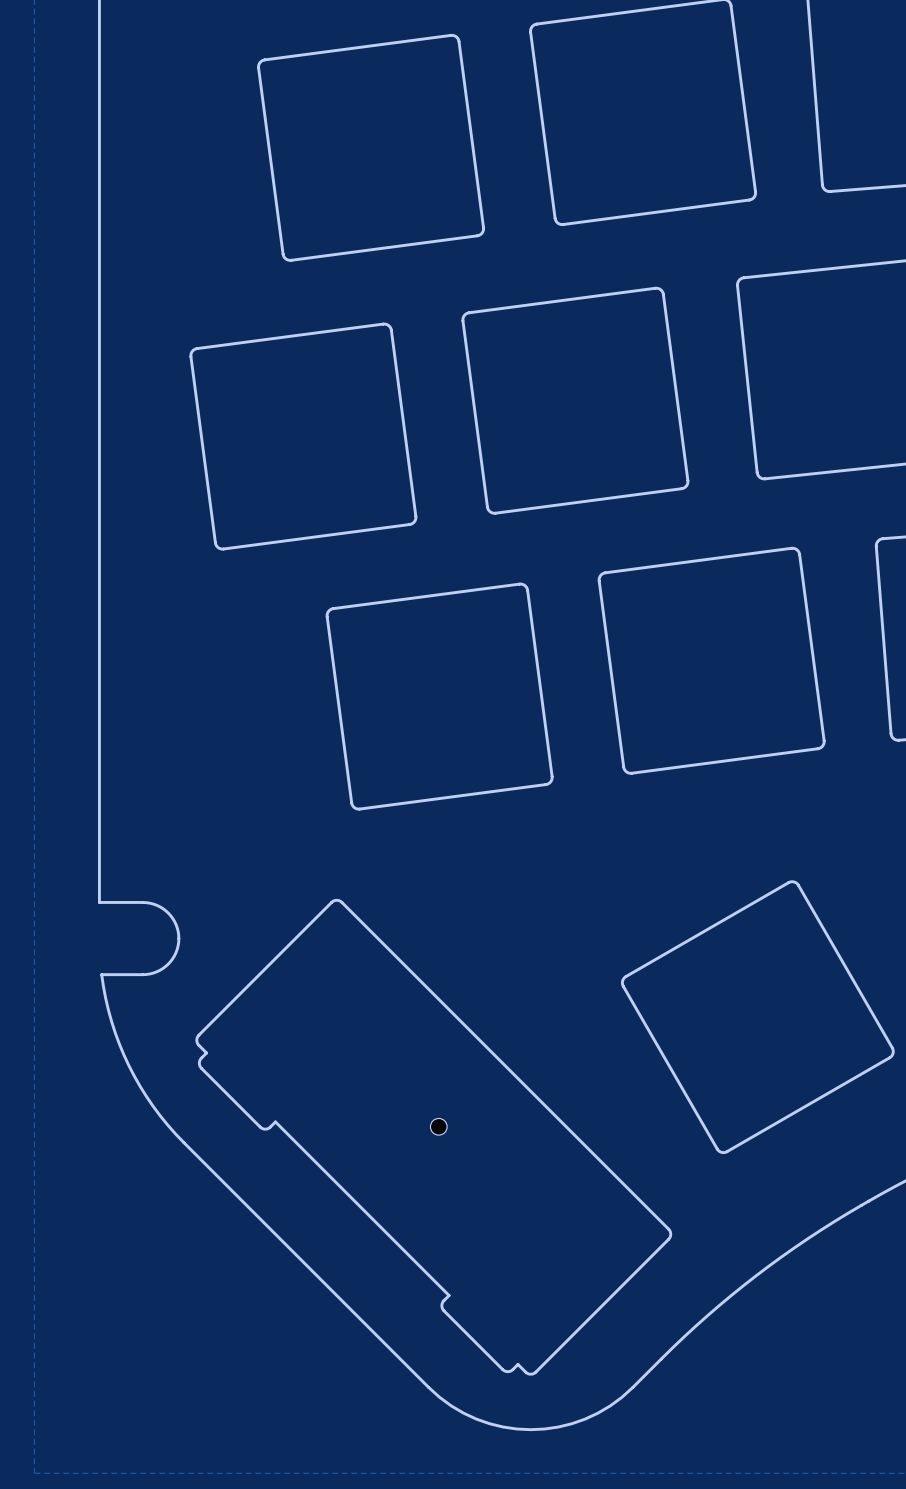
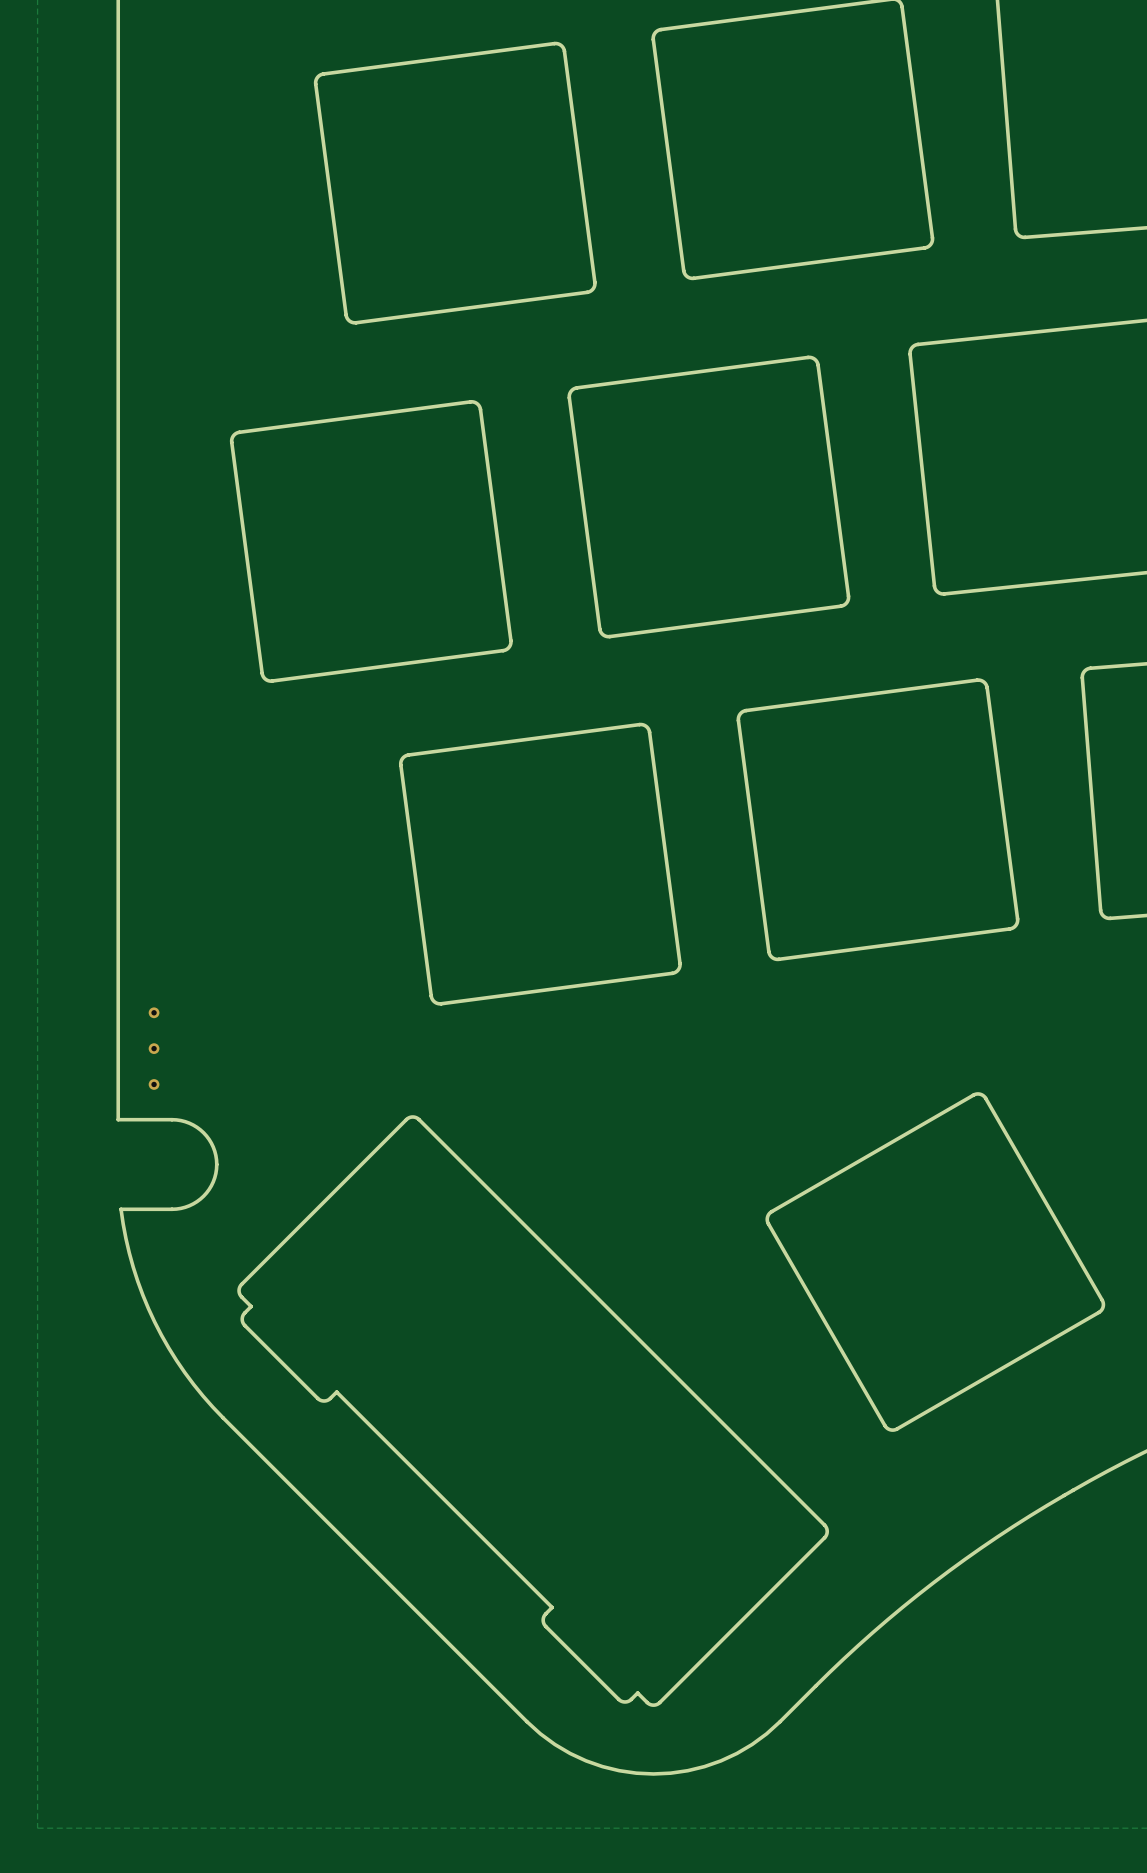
via: none -> (154, 1012)
via: none -> (154, 1048)
via: none -> (154, 1084)
part: (438, 1126) -> none

